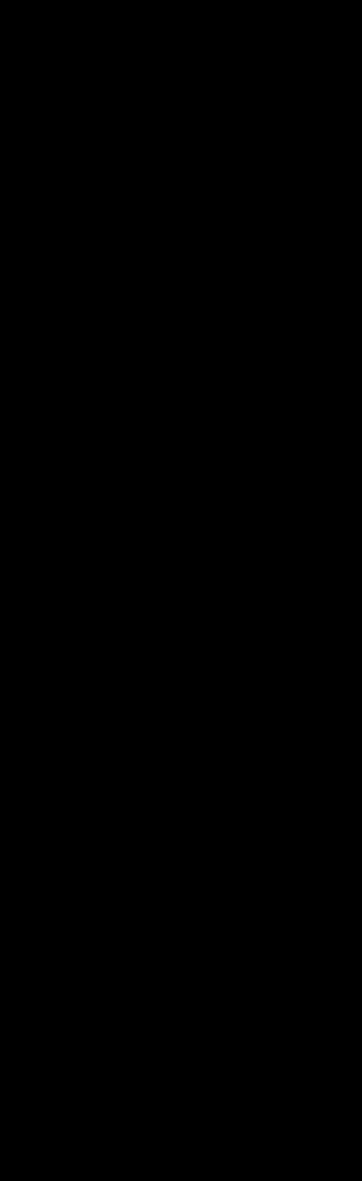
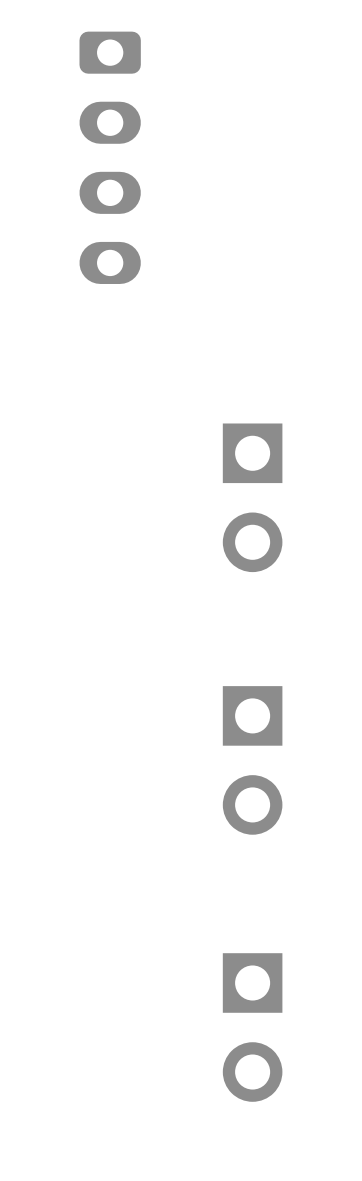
part: none -> (110, 157)
part: none -> (252, 497)
part: none -> (252, 760)
part: none -> (252, 1027)

